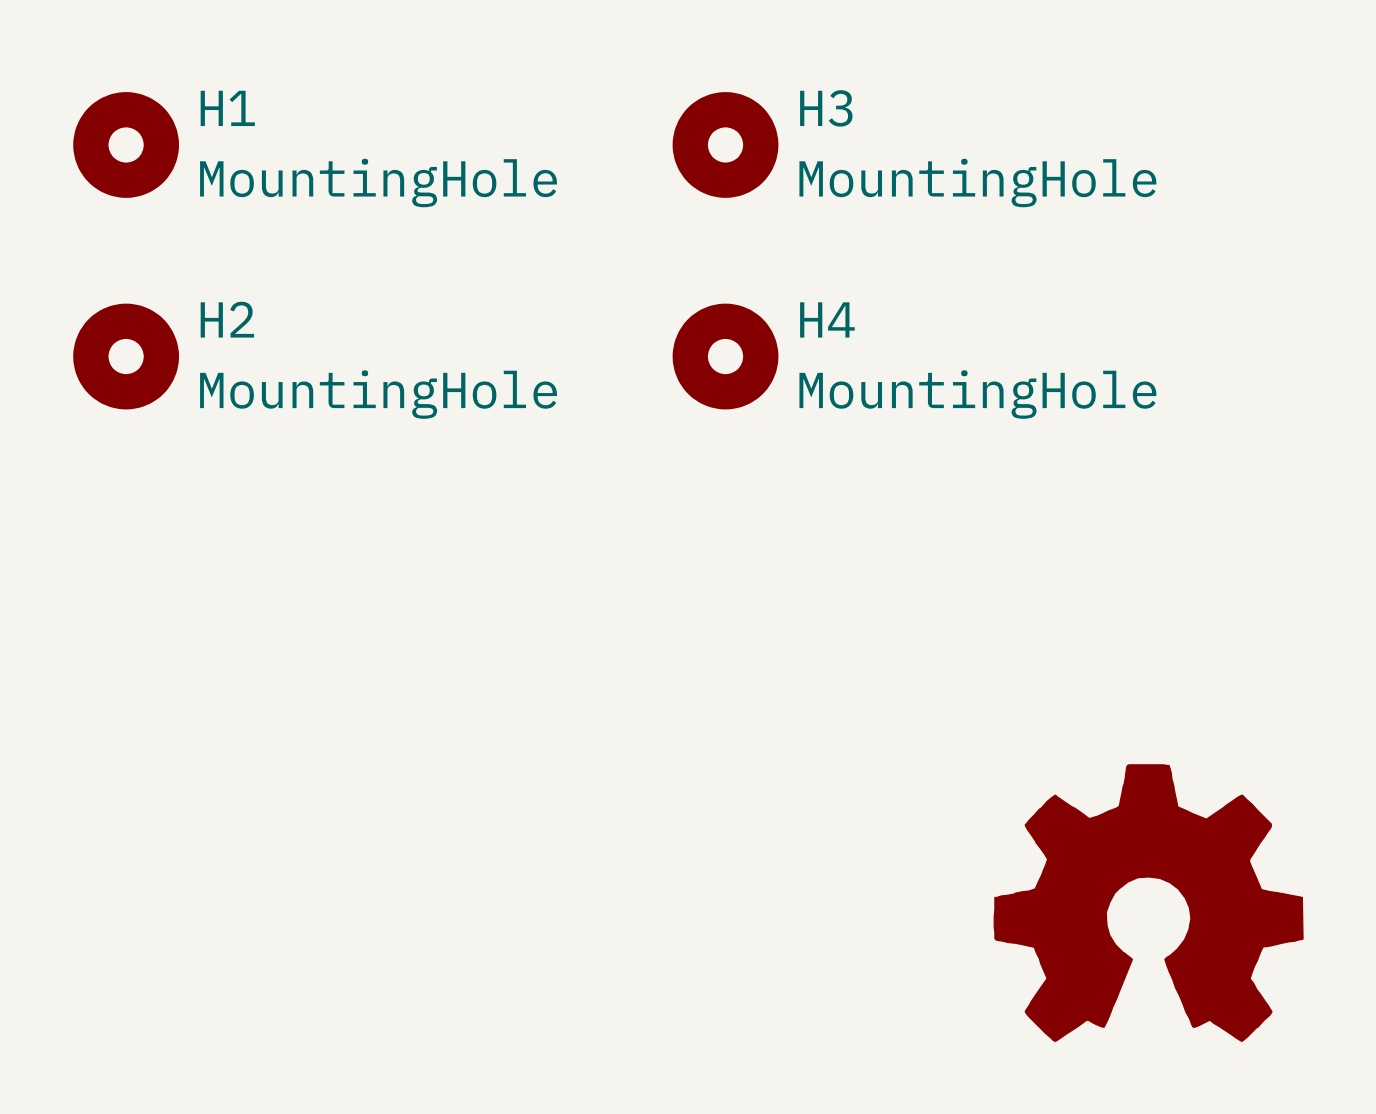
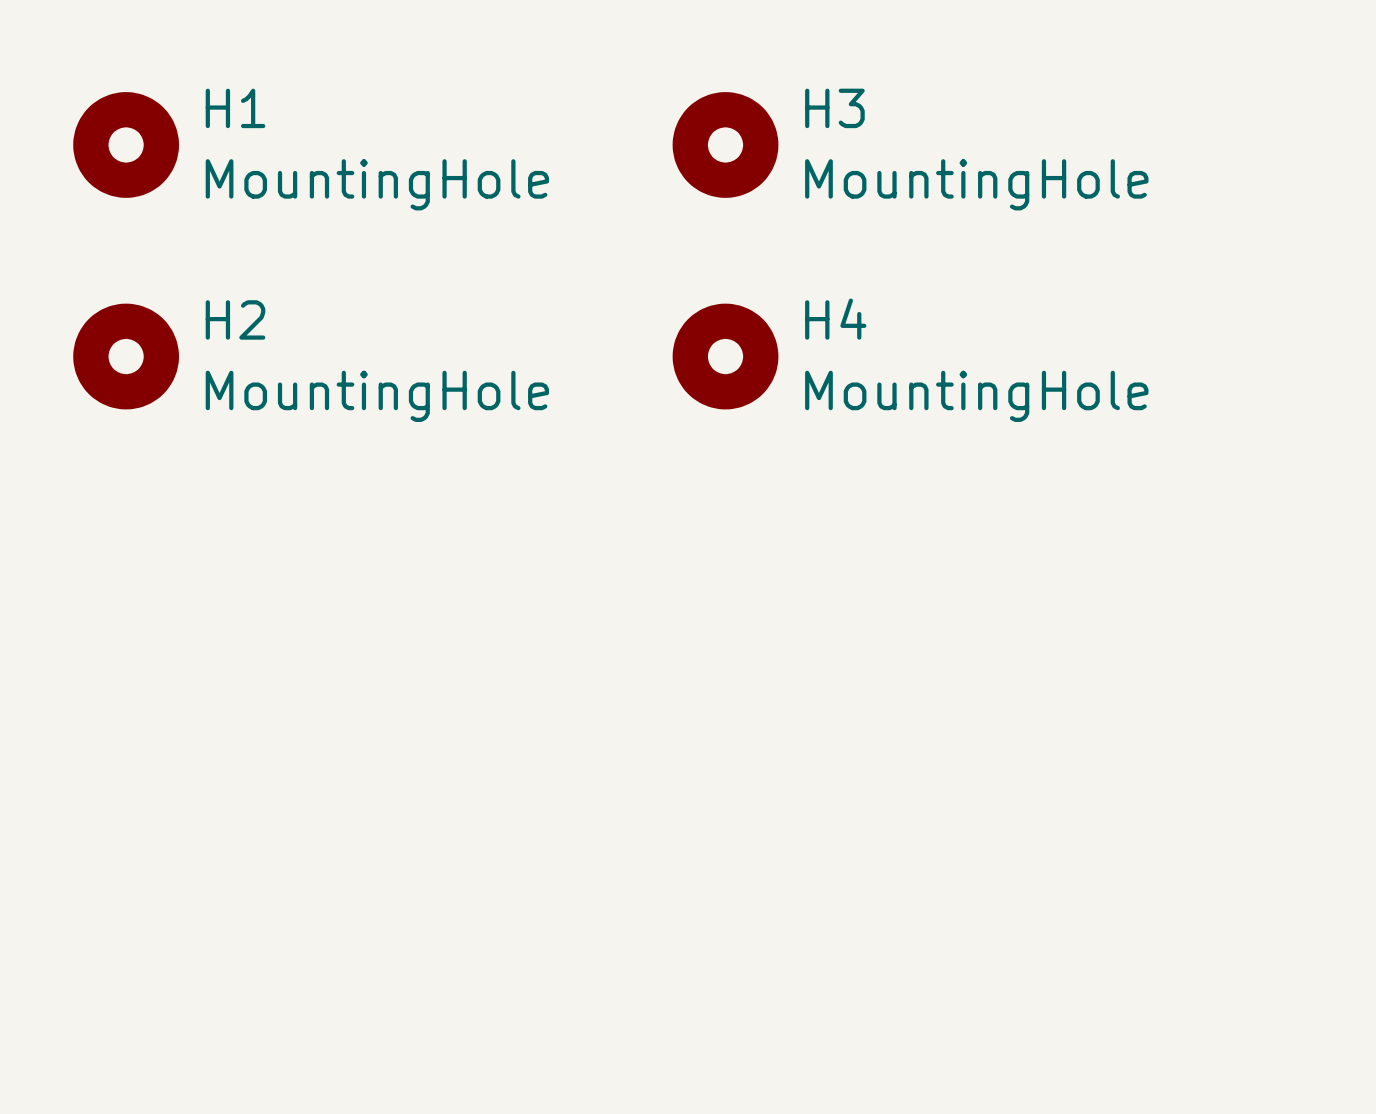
power symbol: (1148, 903) -> none

